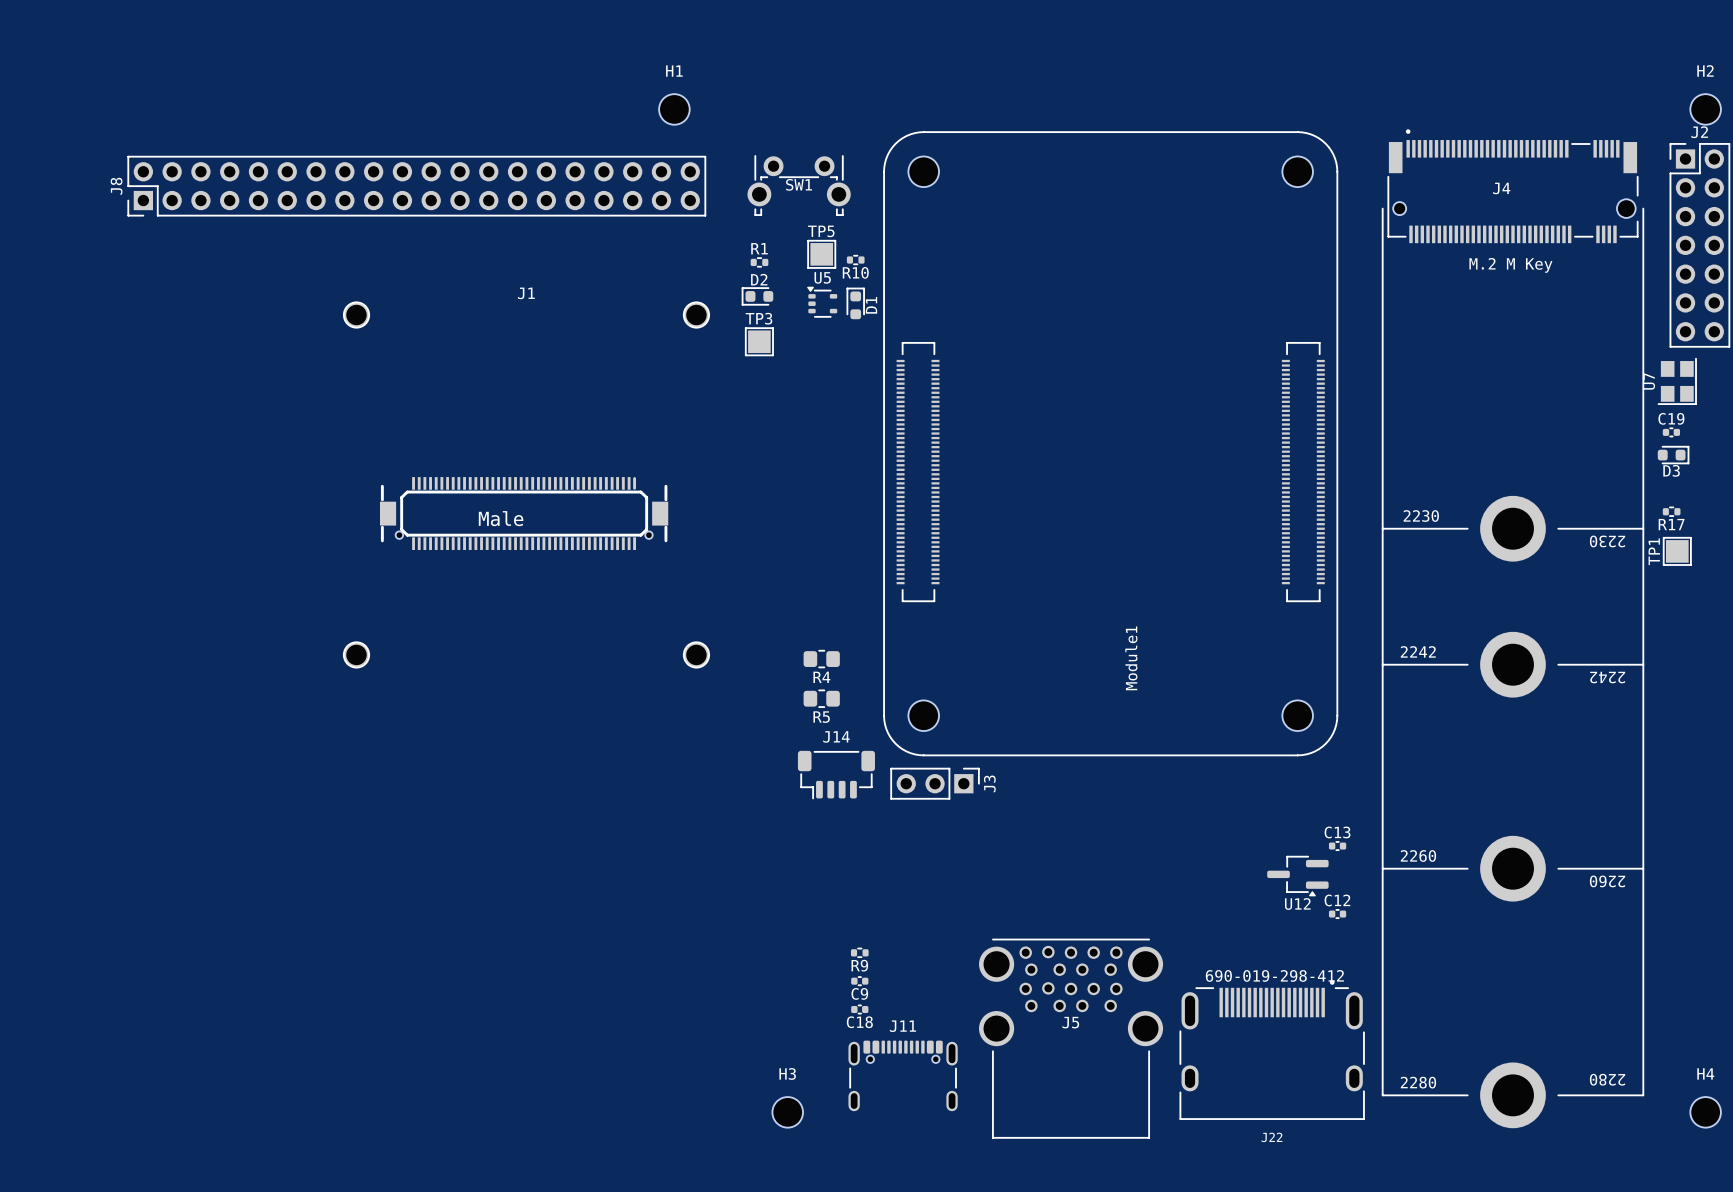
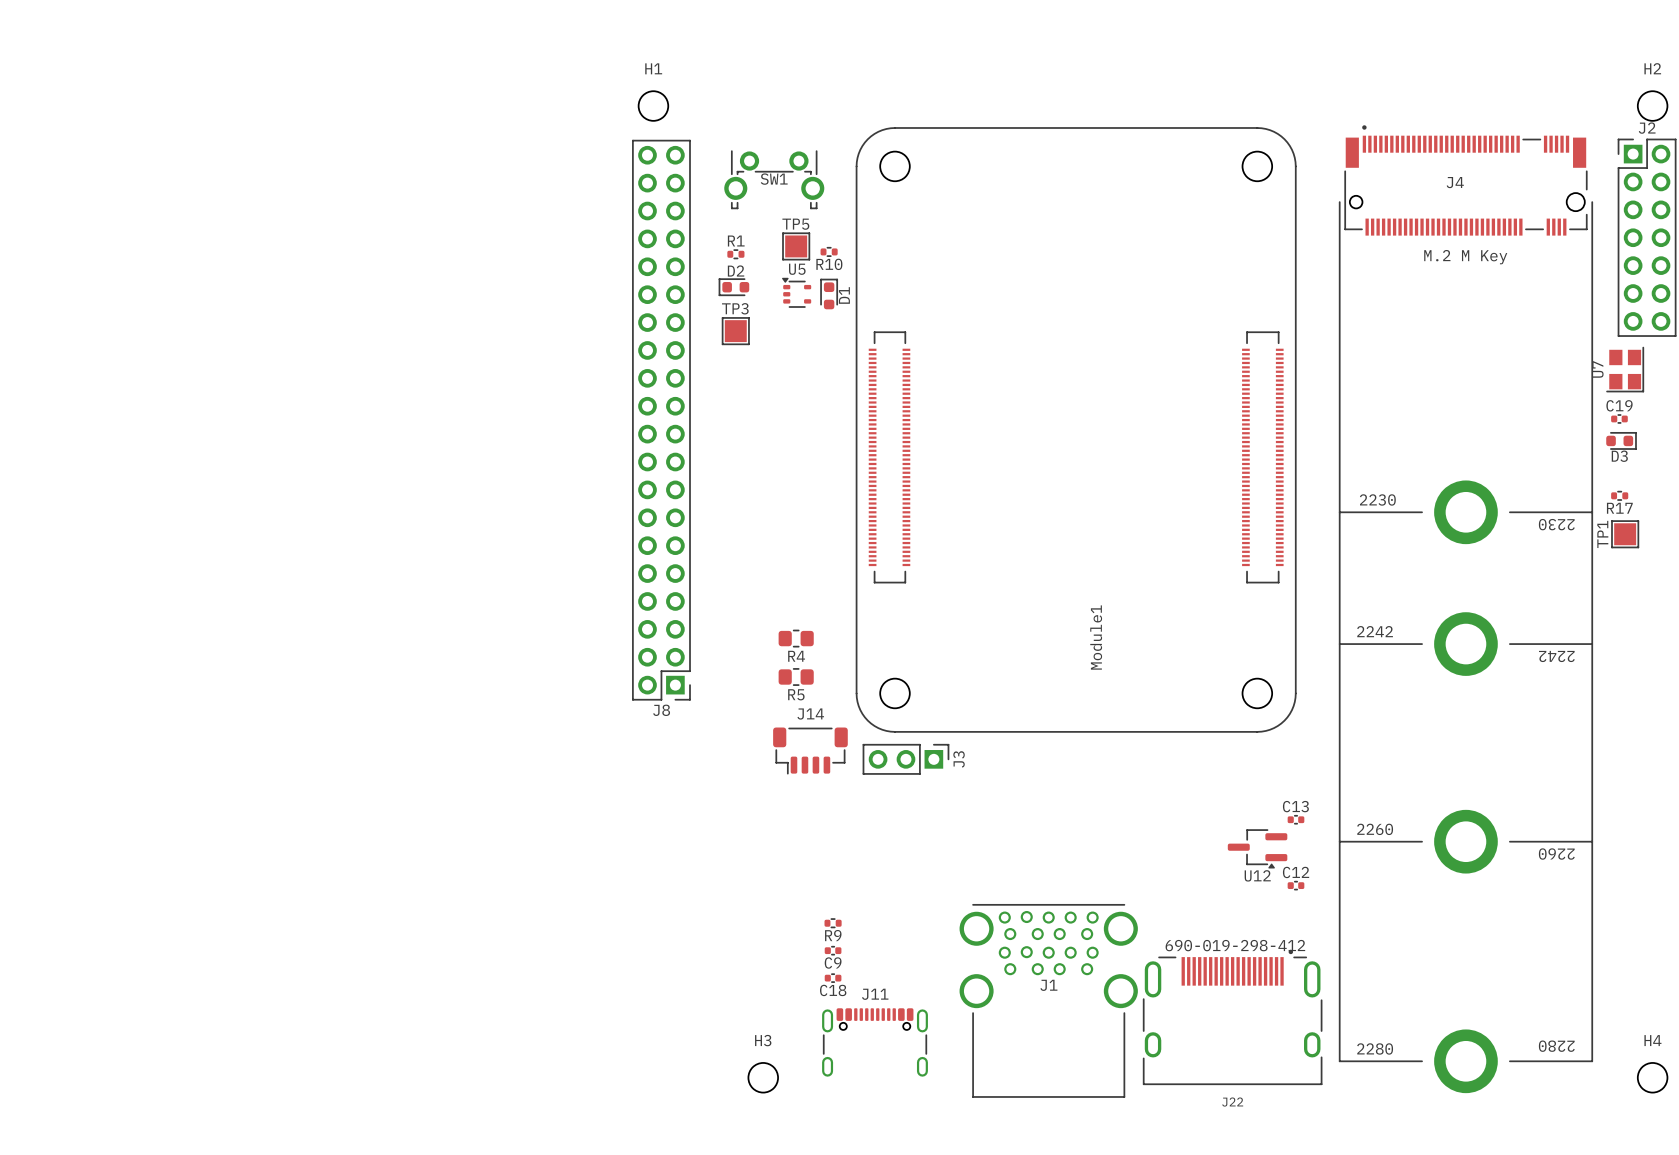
J8 rotation: 0° (416, 186) -> 90° counterclockwise (661, 420)
J8 position: (416, 186) -> (661, 420)
J1 name position: J1 (526, 293) -> J1 (1048, 985)
J1 footprint: [343, 301, 710, 669] -> [959, 904, 1138, 1098]
J5: (1071, 1038) -> none

